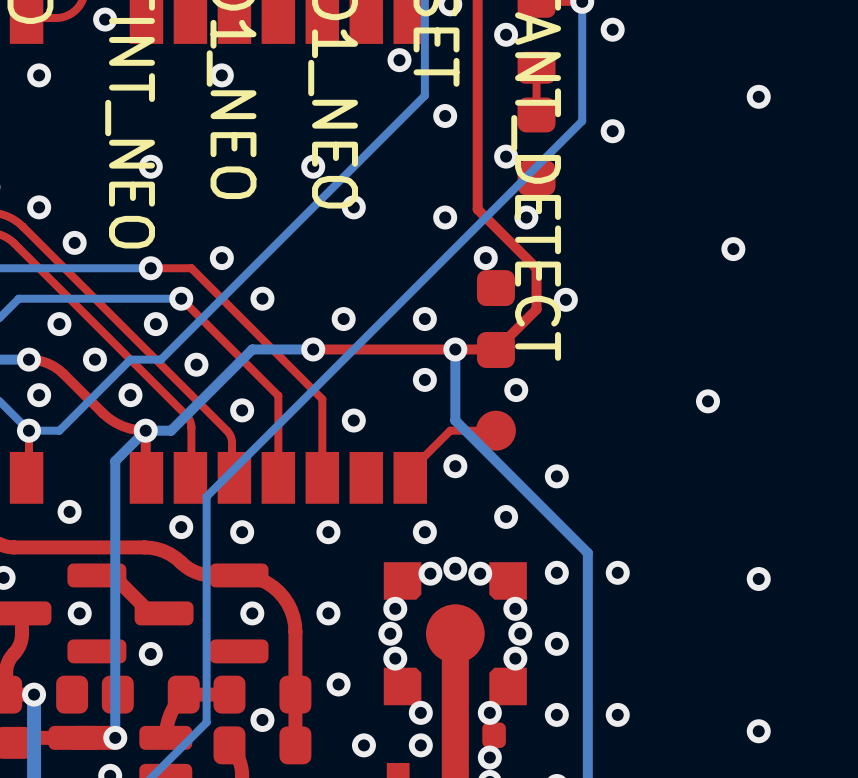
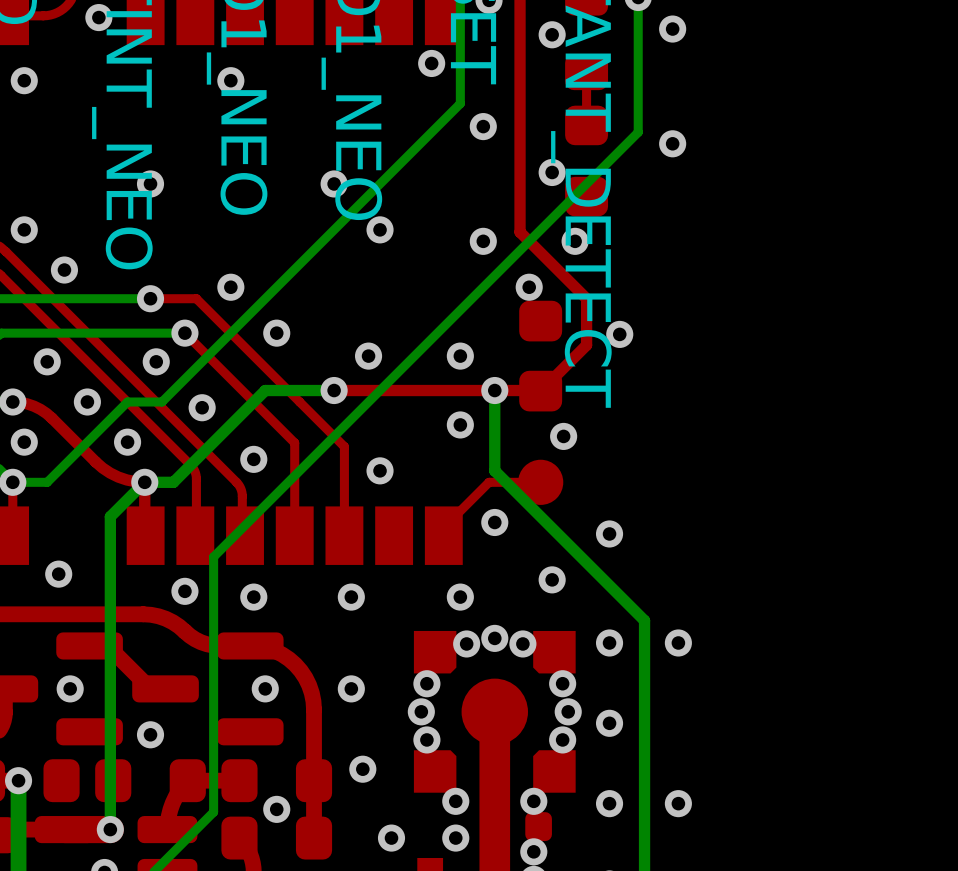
via: (758, 96) -> none
via: (733, 249) -> none
via: (708, 401) -> none
via: (758, 579) -> none
via: (758, 731) -> none

